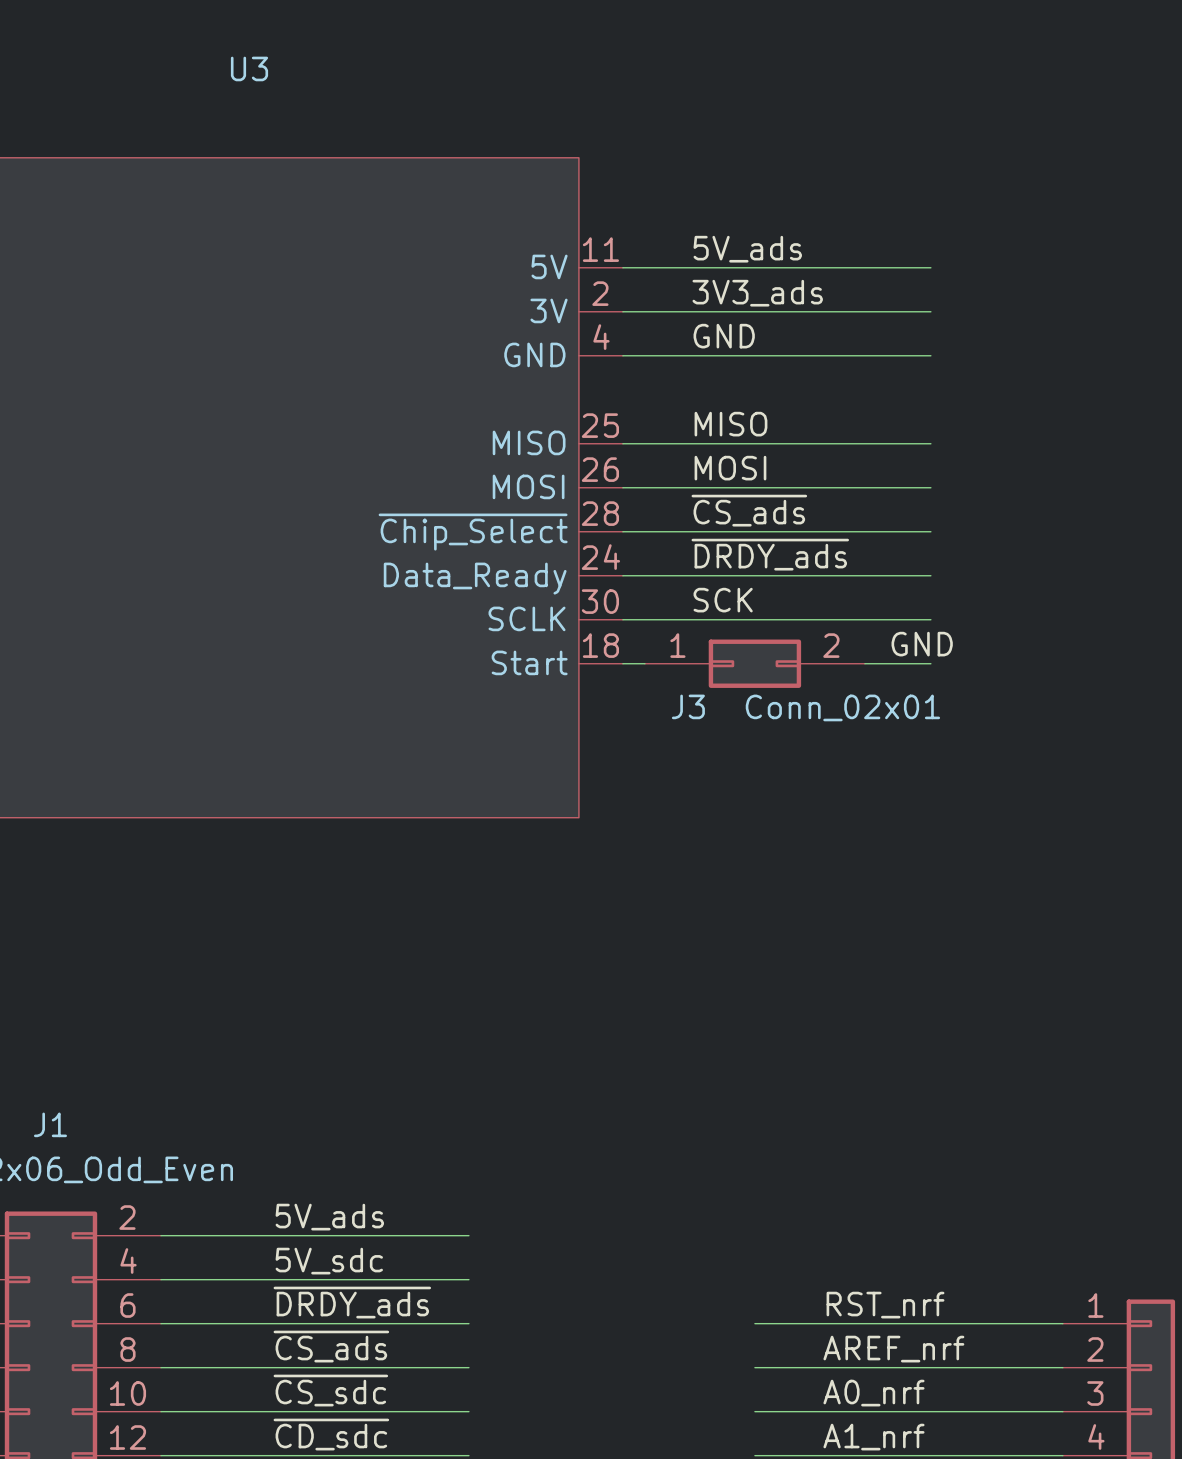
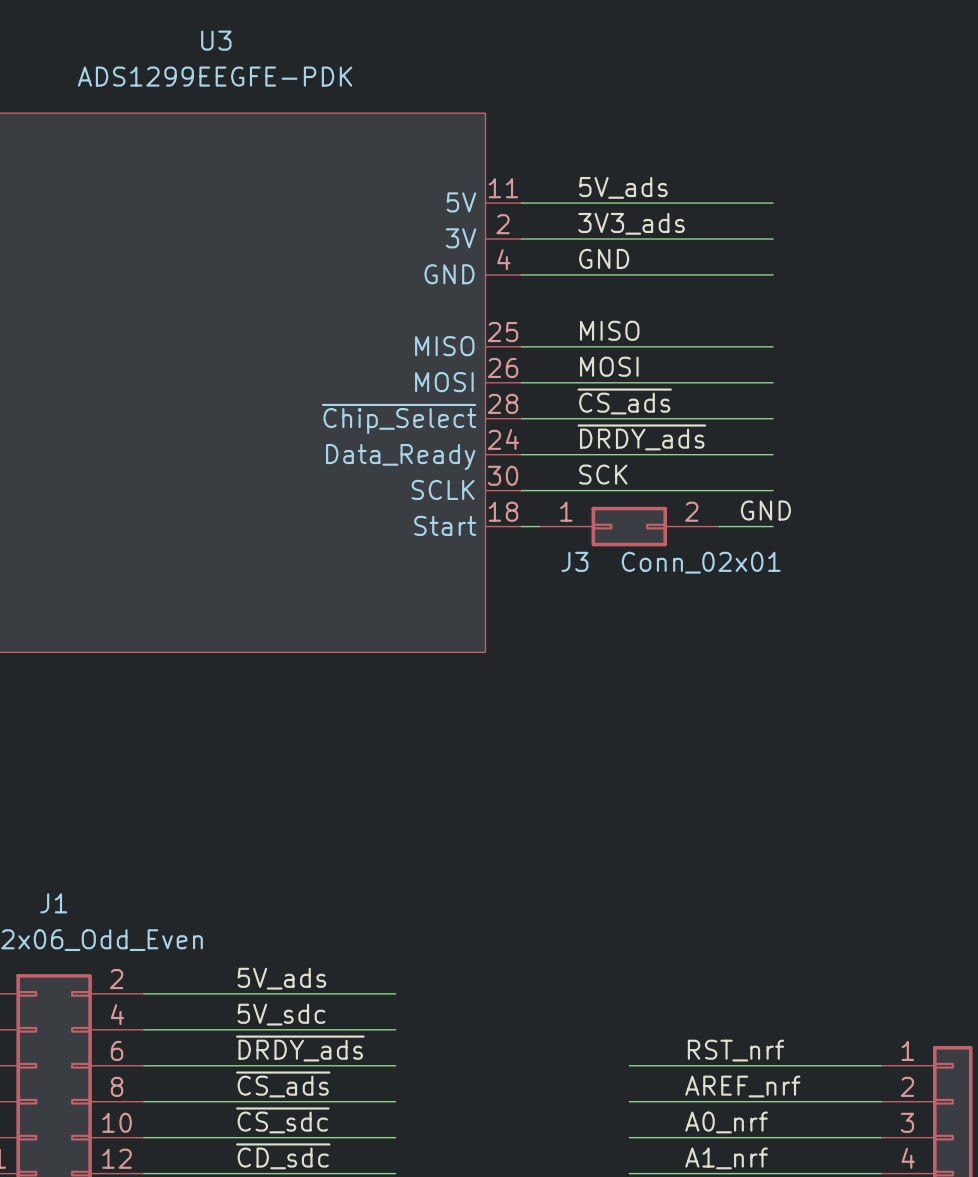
U3 value: none -> ADS1299EEGFE-PDK (215, 76)

